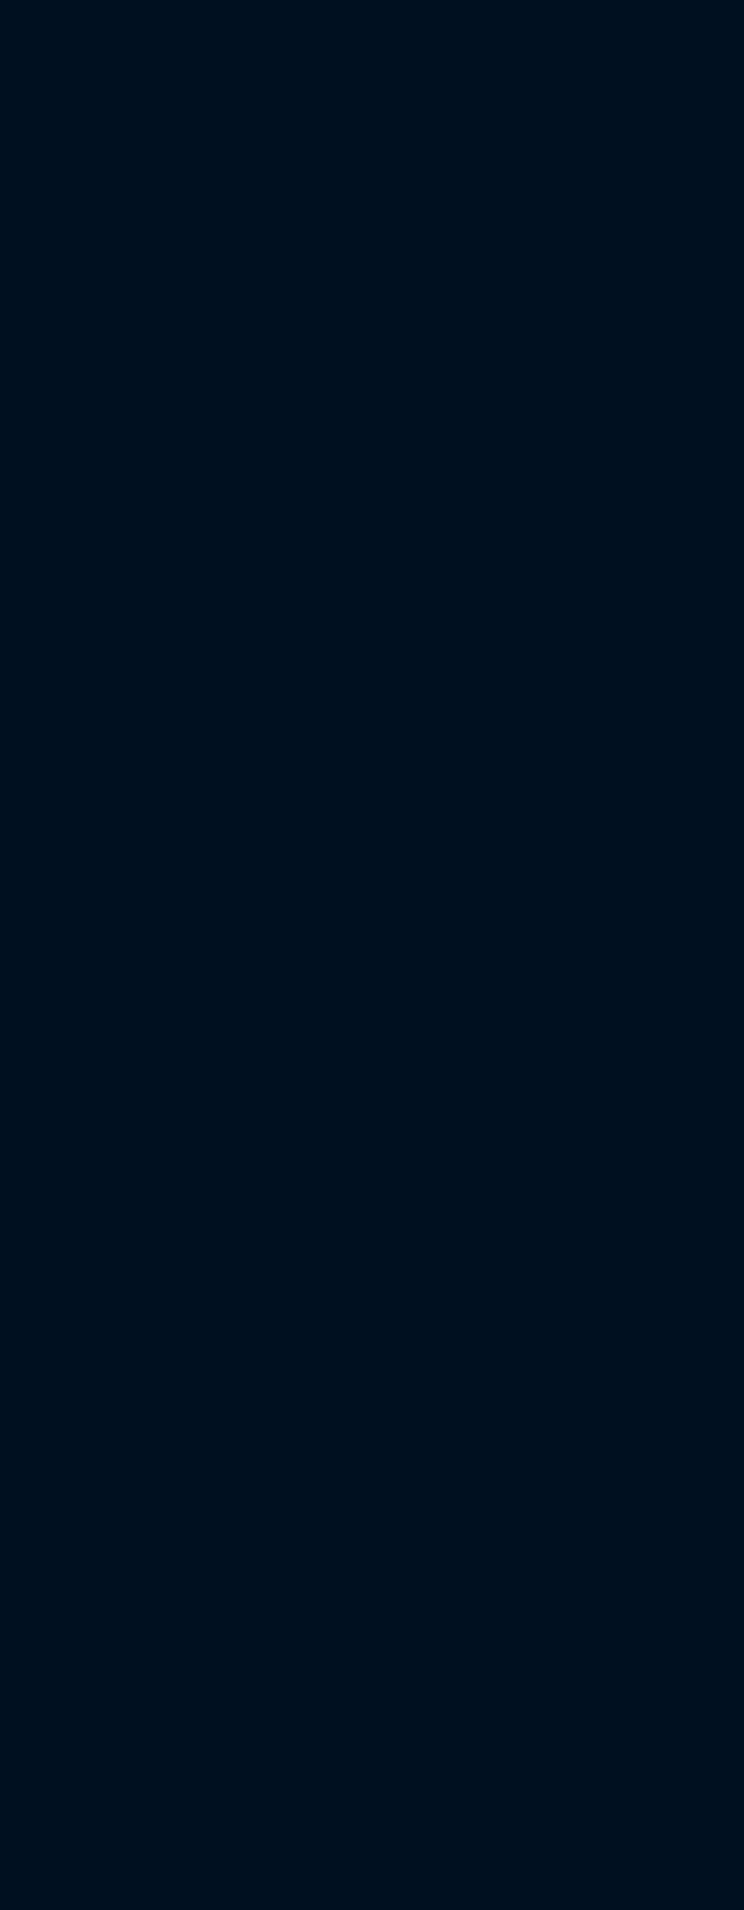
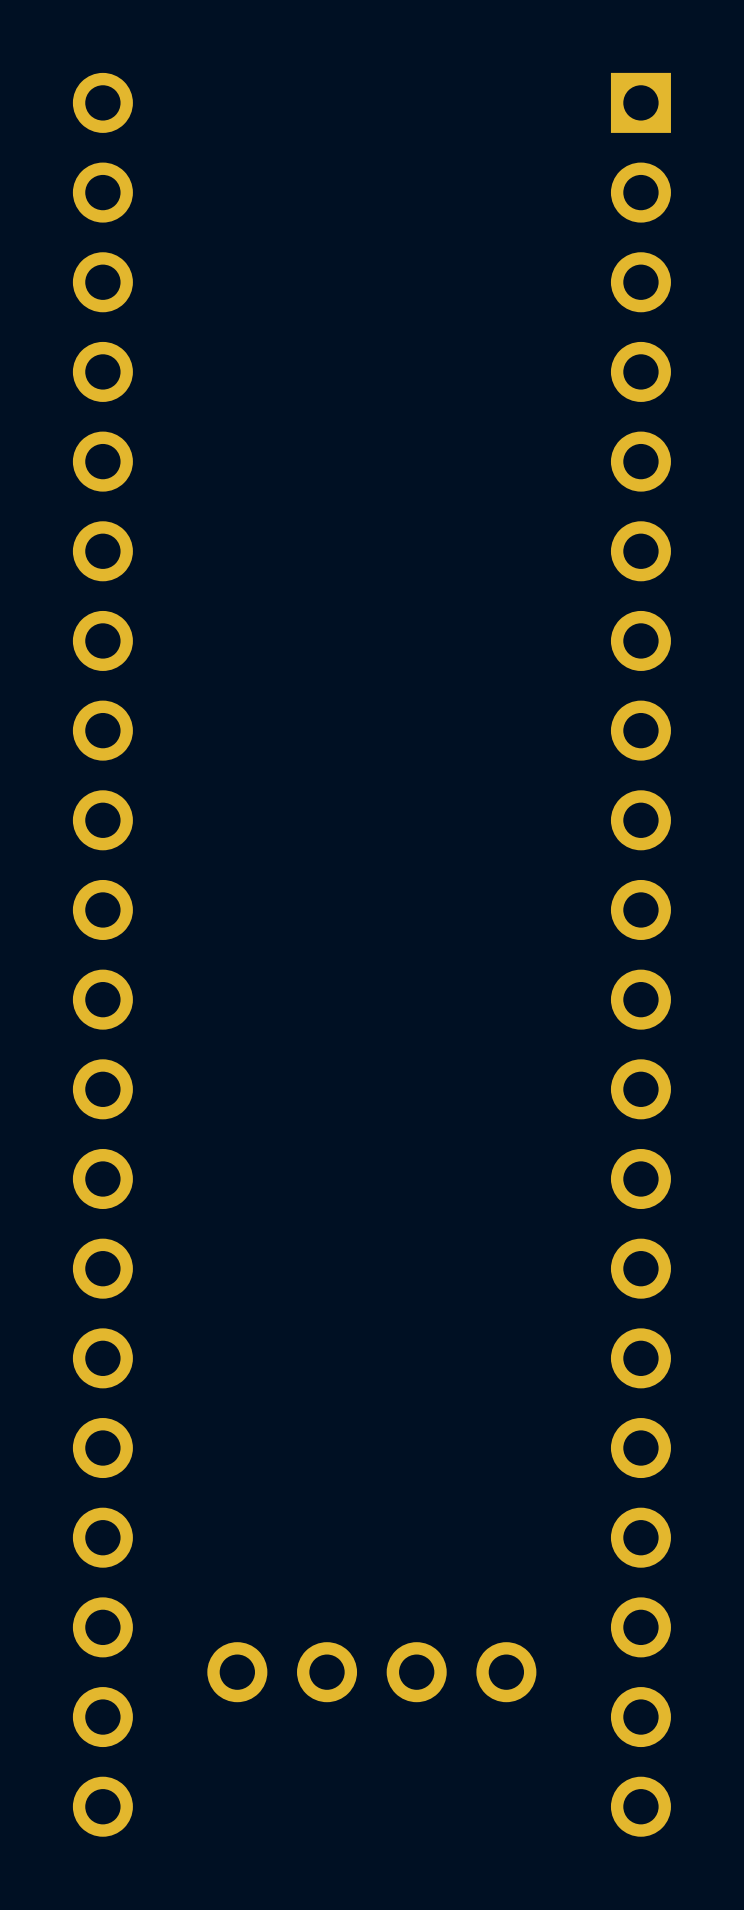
part: none -> (371, 954)

